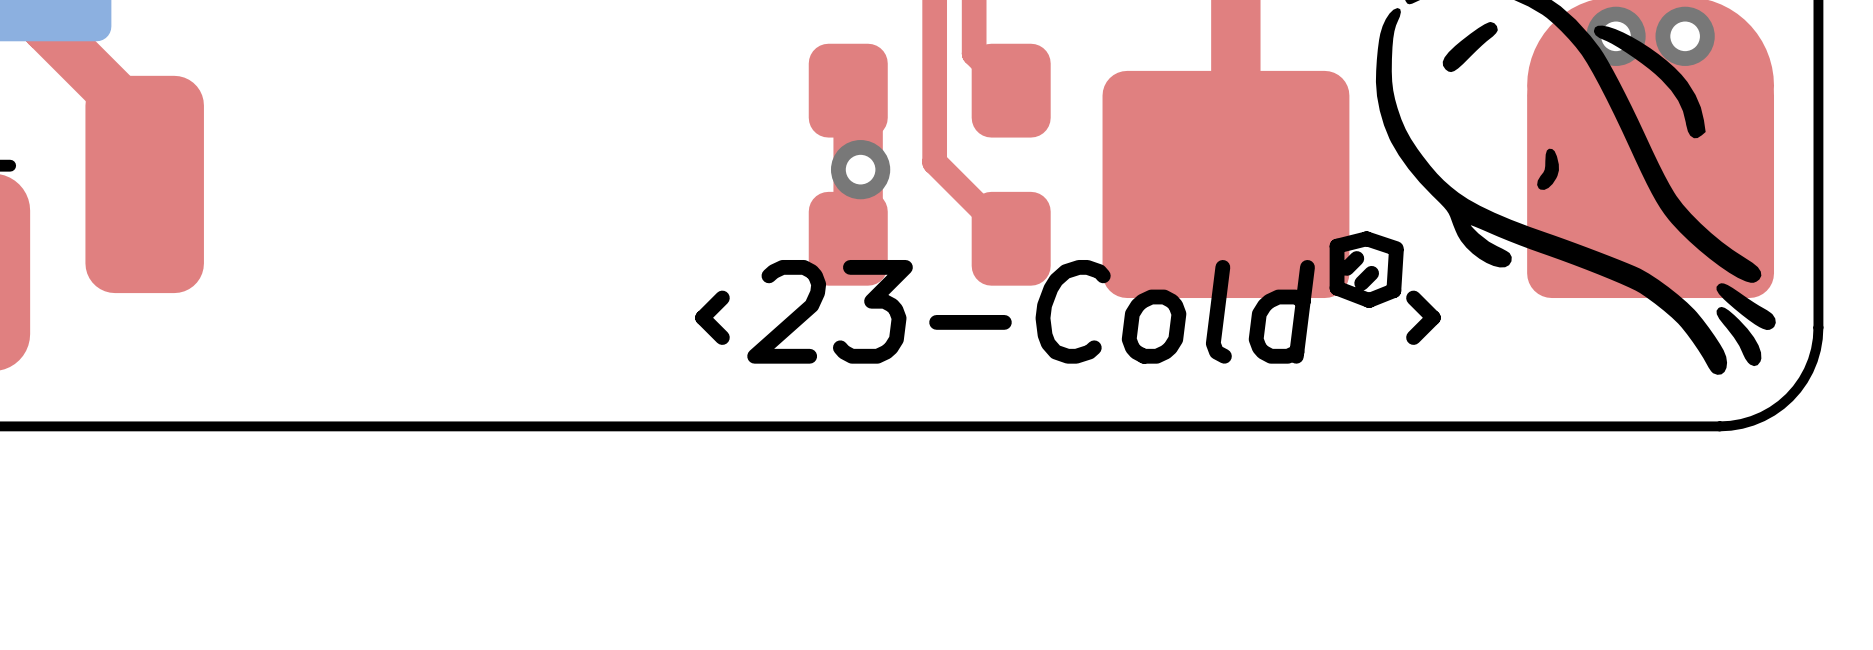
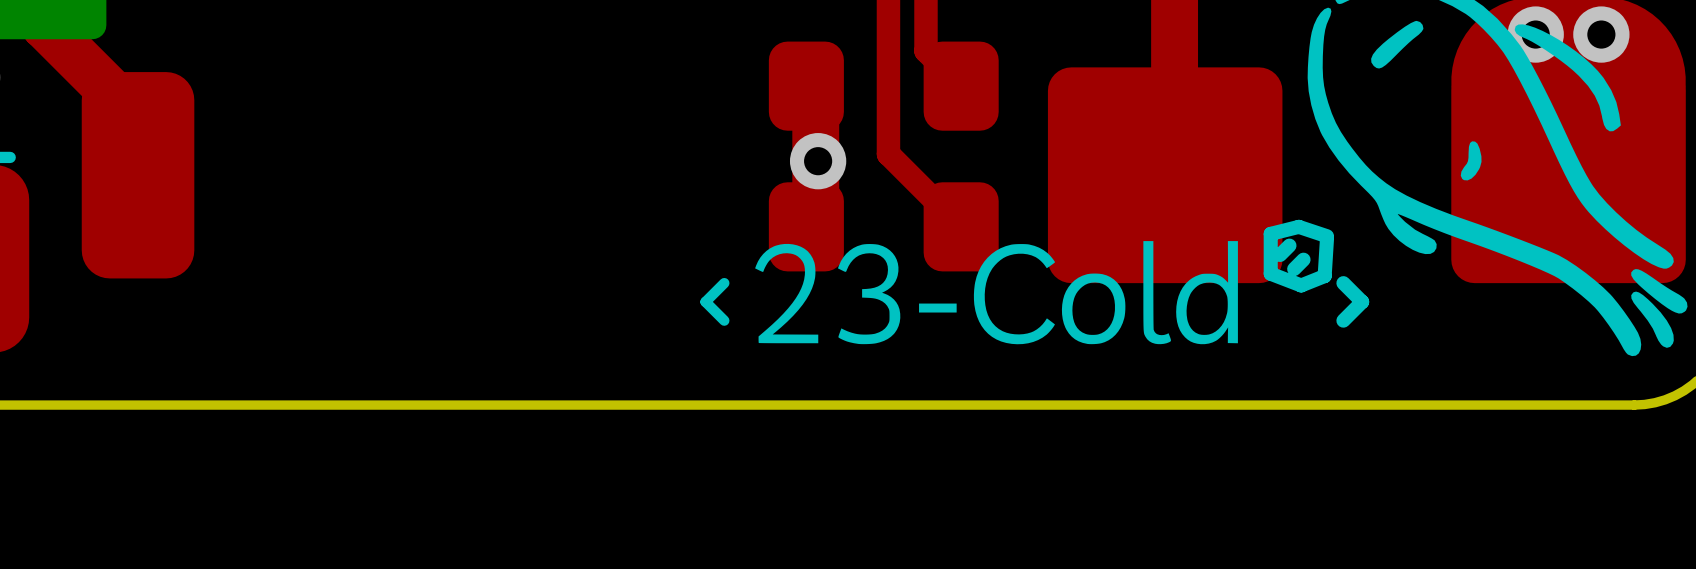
drawing: none -> [755, 241, 1238, 345]
line: (722, 298) (702, 317) (722, 337) -> (724, 283) (705, 301) (724, 320)
text: 23-Cold (1031, 311) -> none

